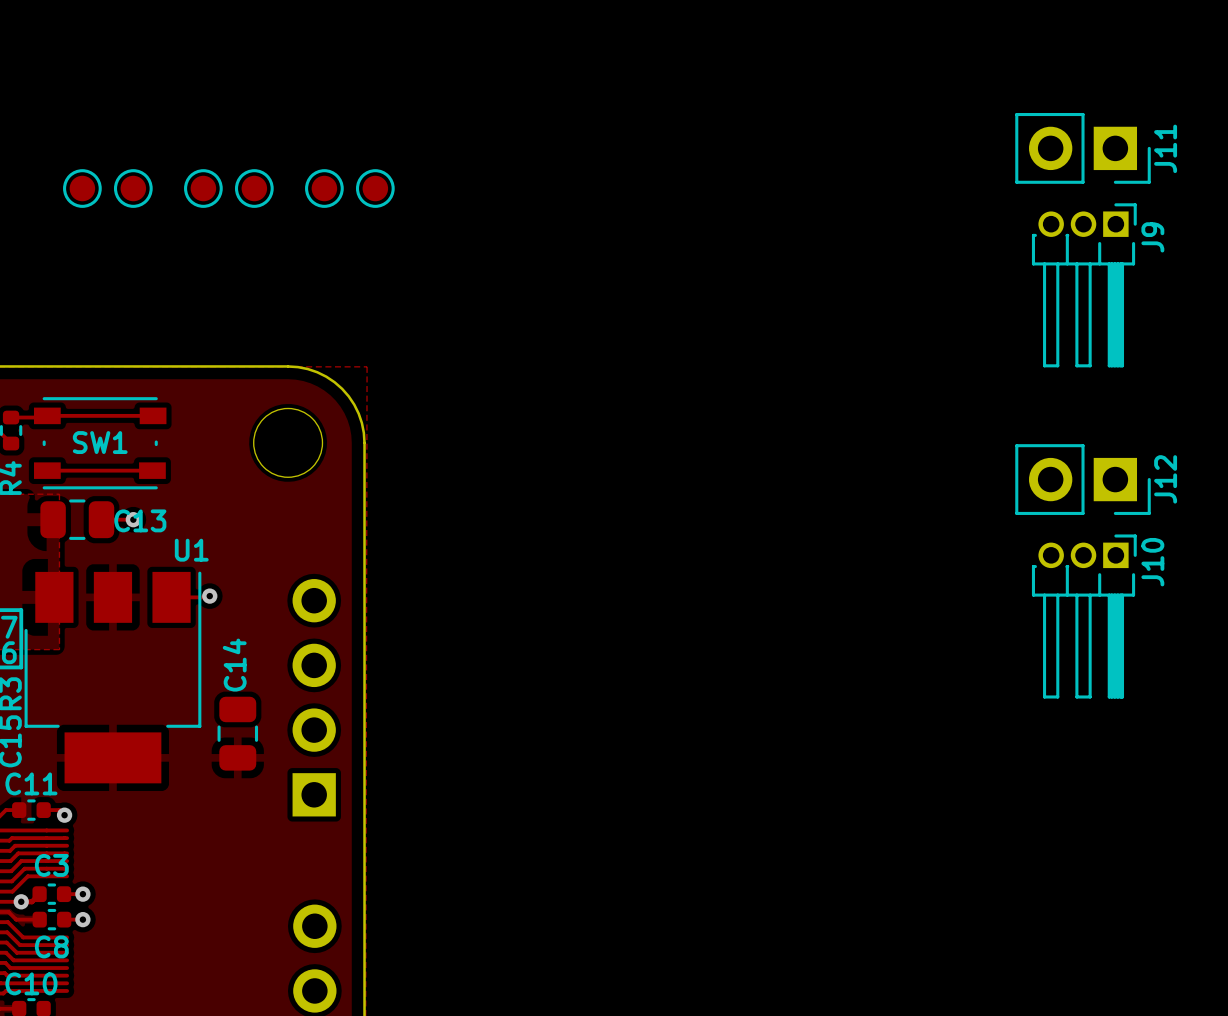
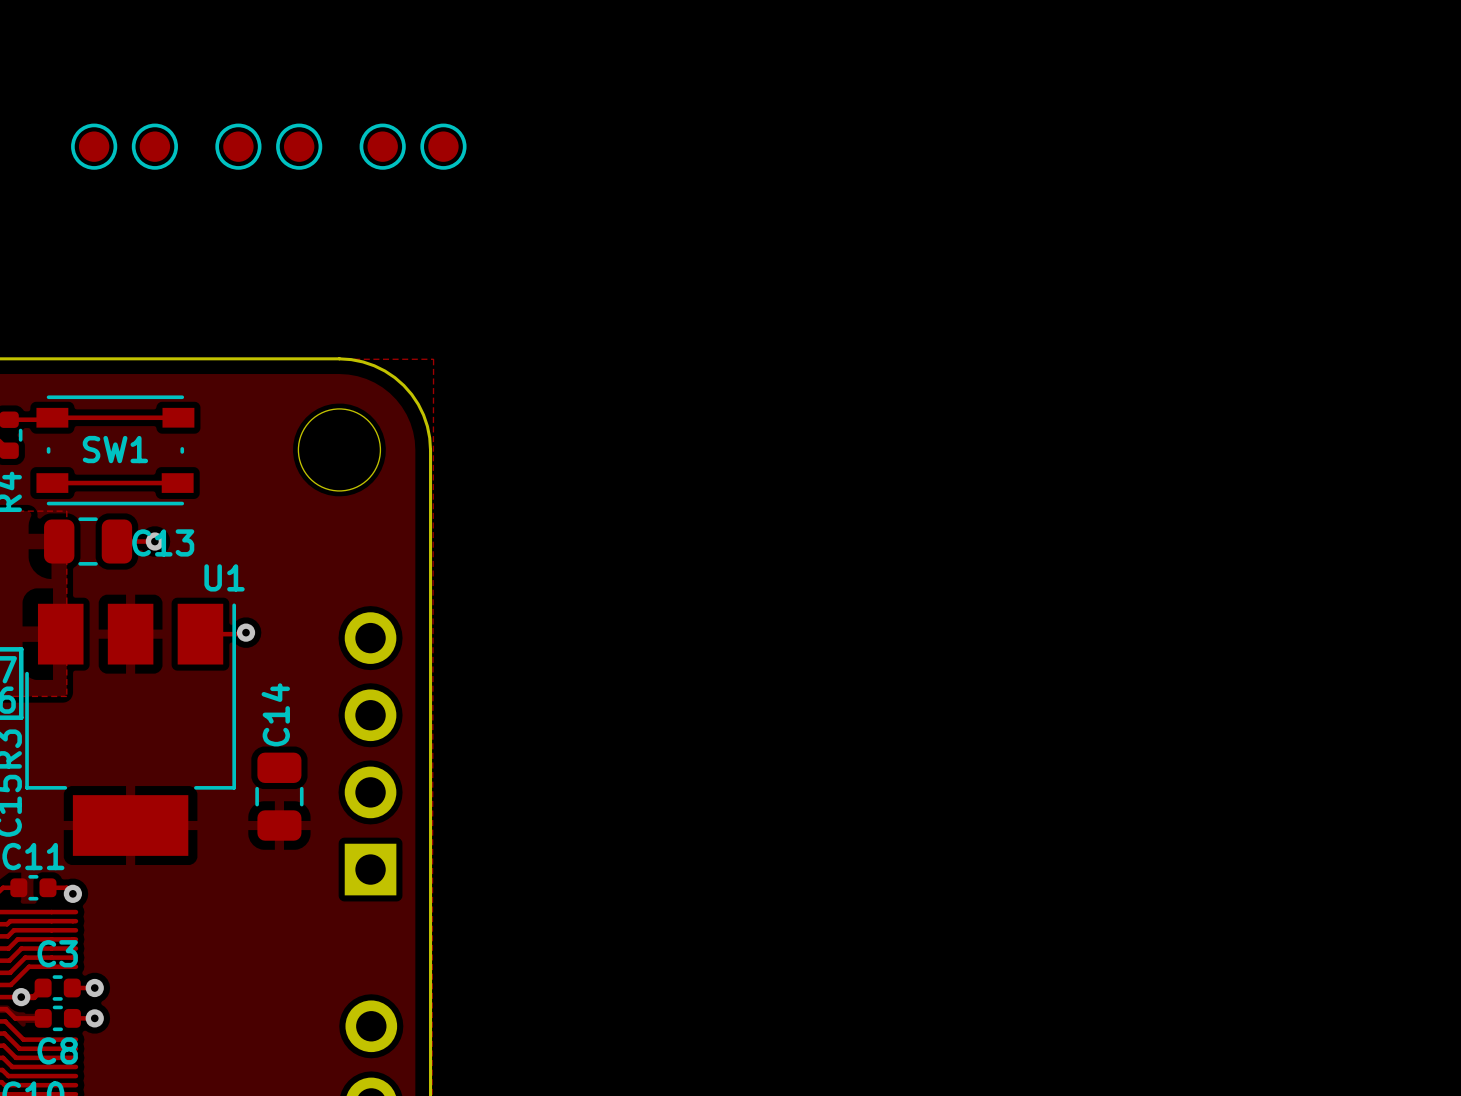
J11: (1083, 148) -> none
J9: (1084, 285) -> none
J12: (1083, 479) -> none
J10: (1084, 616) -> none

